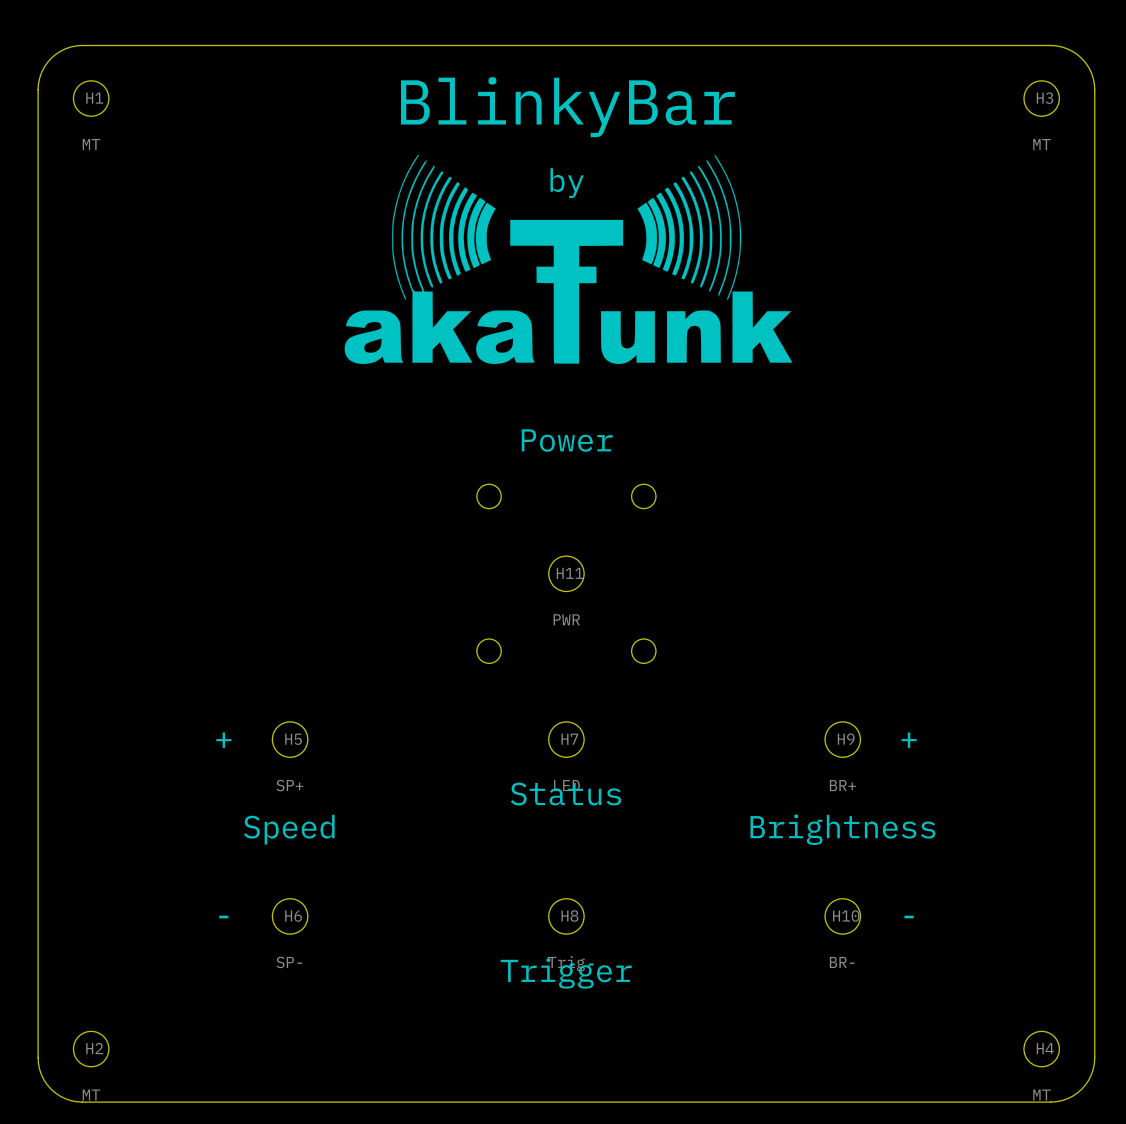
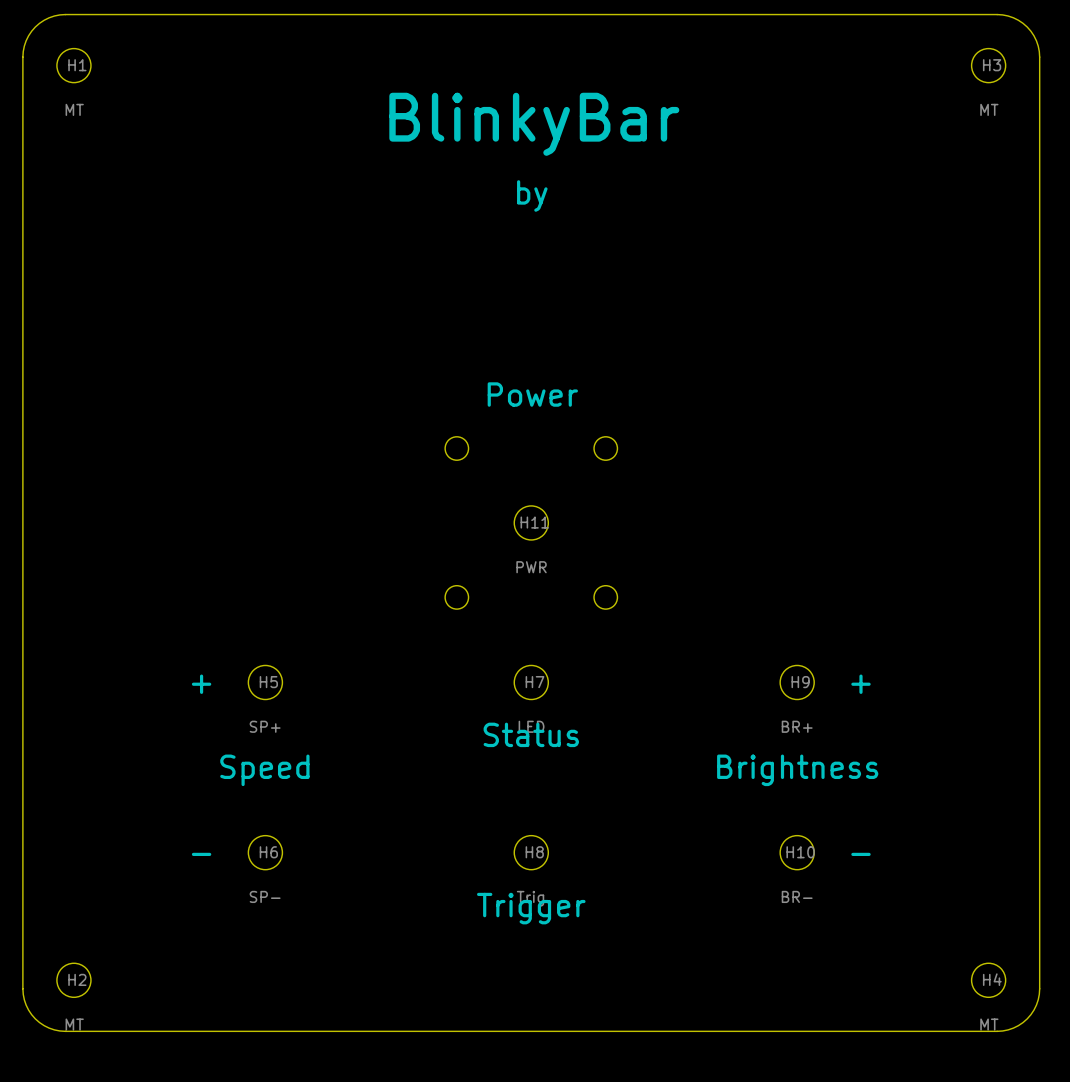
text position: BlinkyBar (567, 107) -> BlinkyBar (534, 124)
drawing: [344, 154, 793, 365] -> none
text position: by (567, 183) -> by (532, 195)

